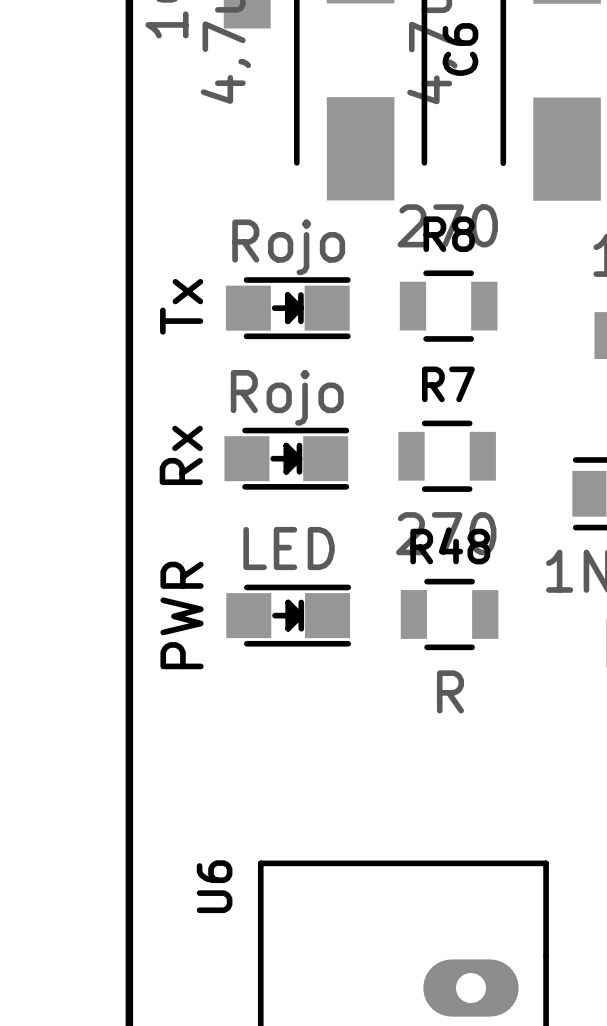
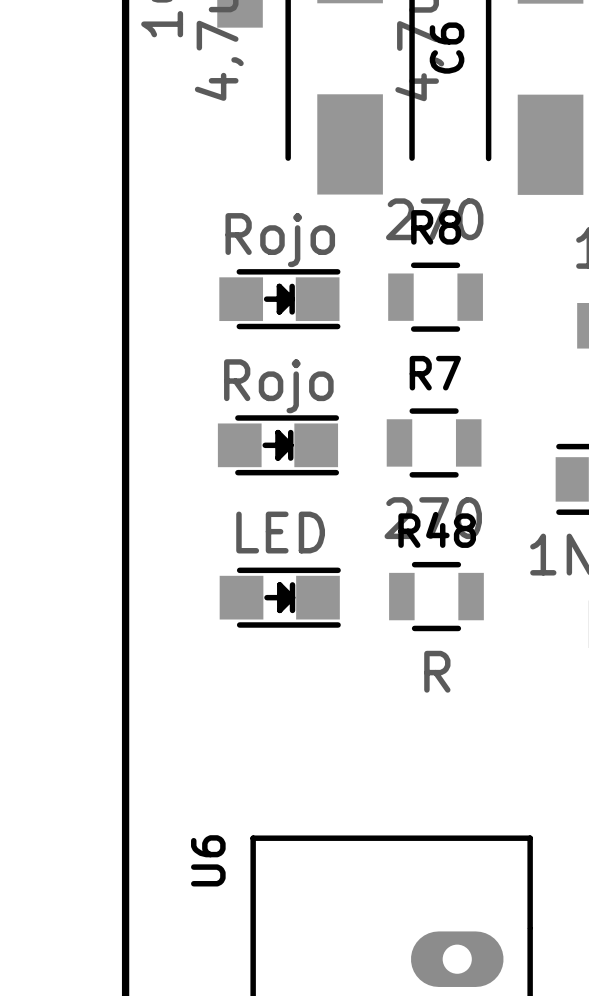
text: Tx (181, 306) -> none
text: Rx (181, 455) -> none
text: PWR (182, 615) -> none

